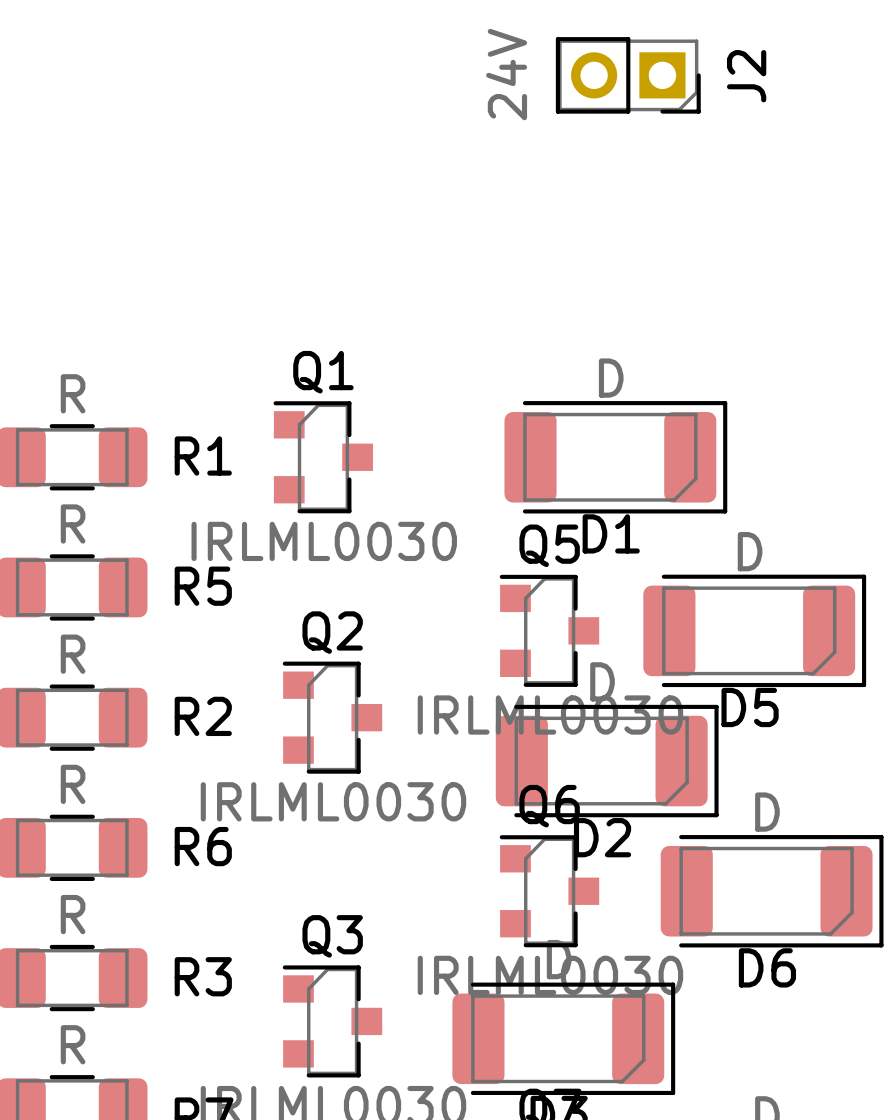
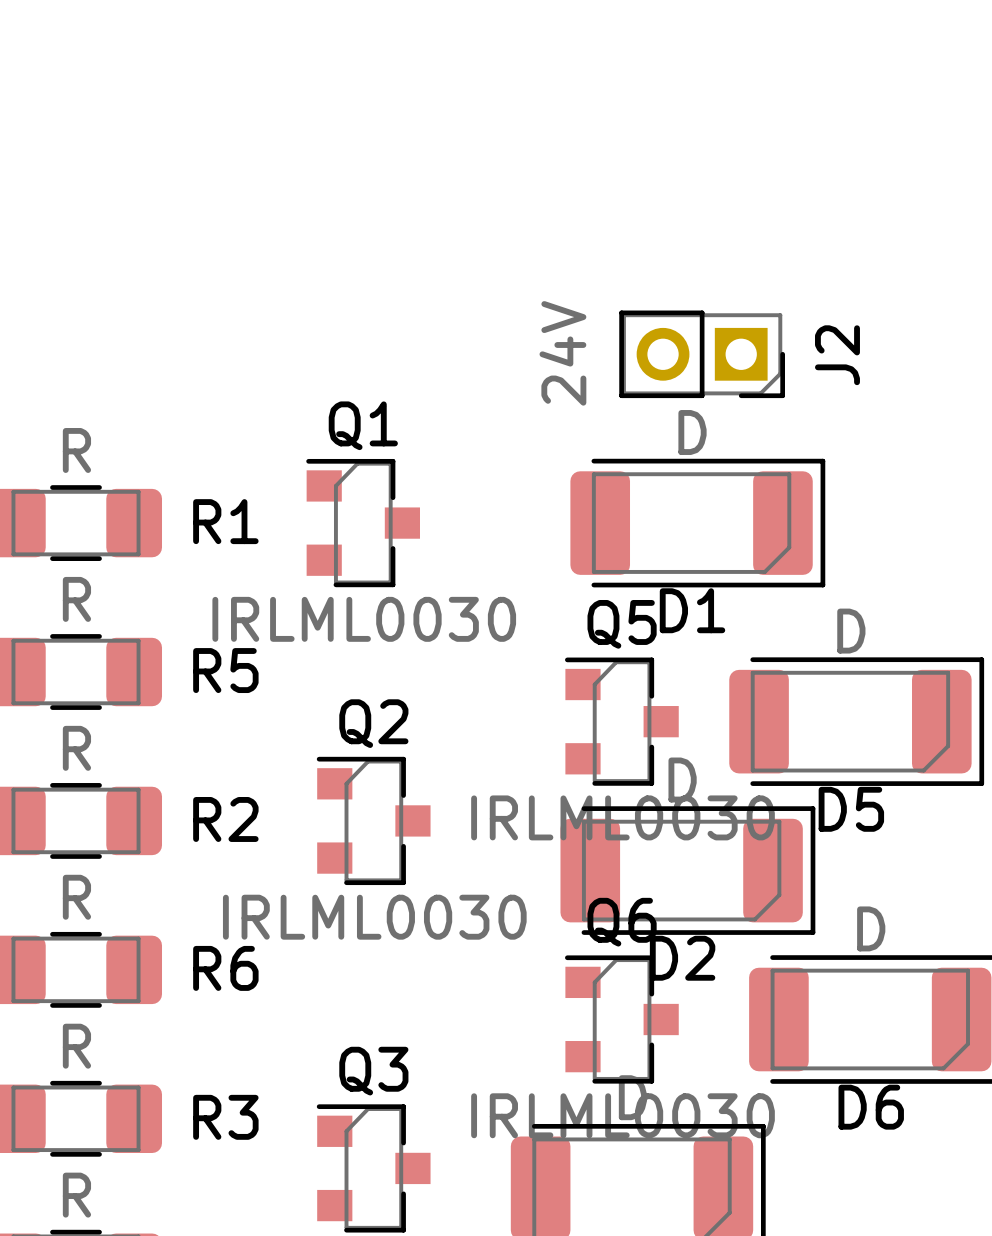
J2 position: (628, 75) -> (702, 354)

